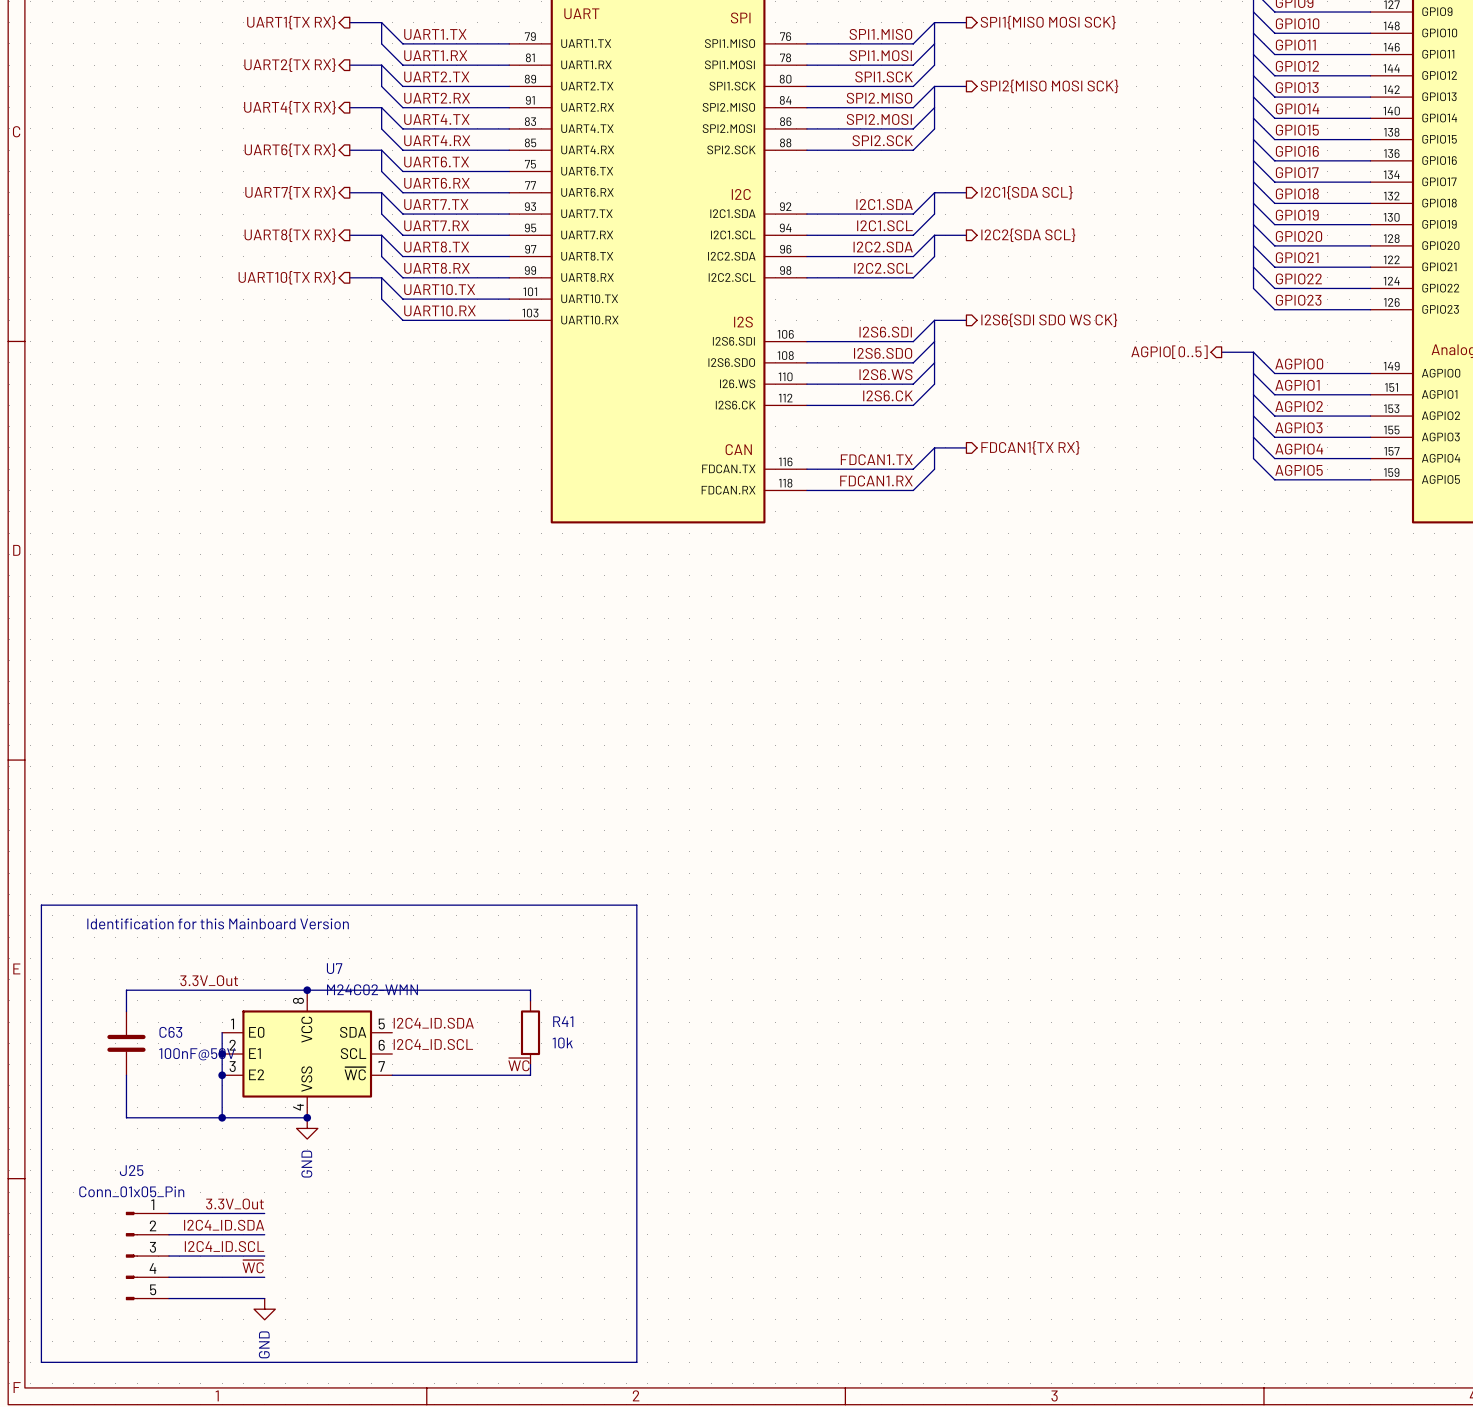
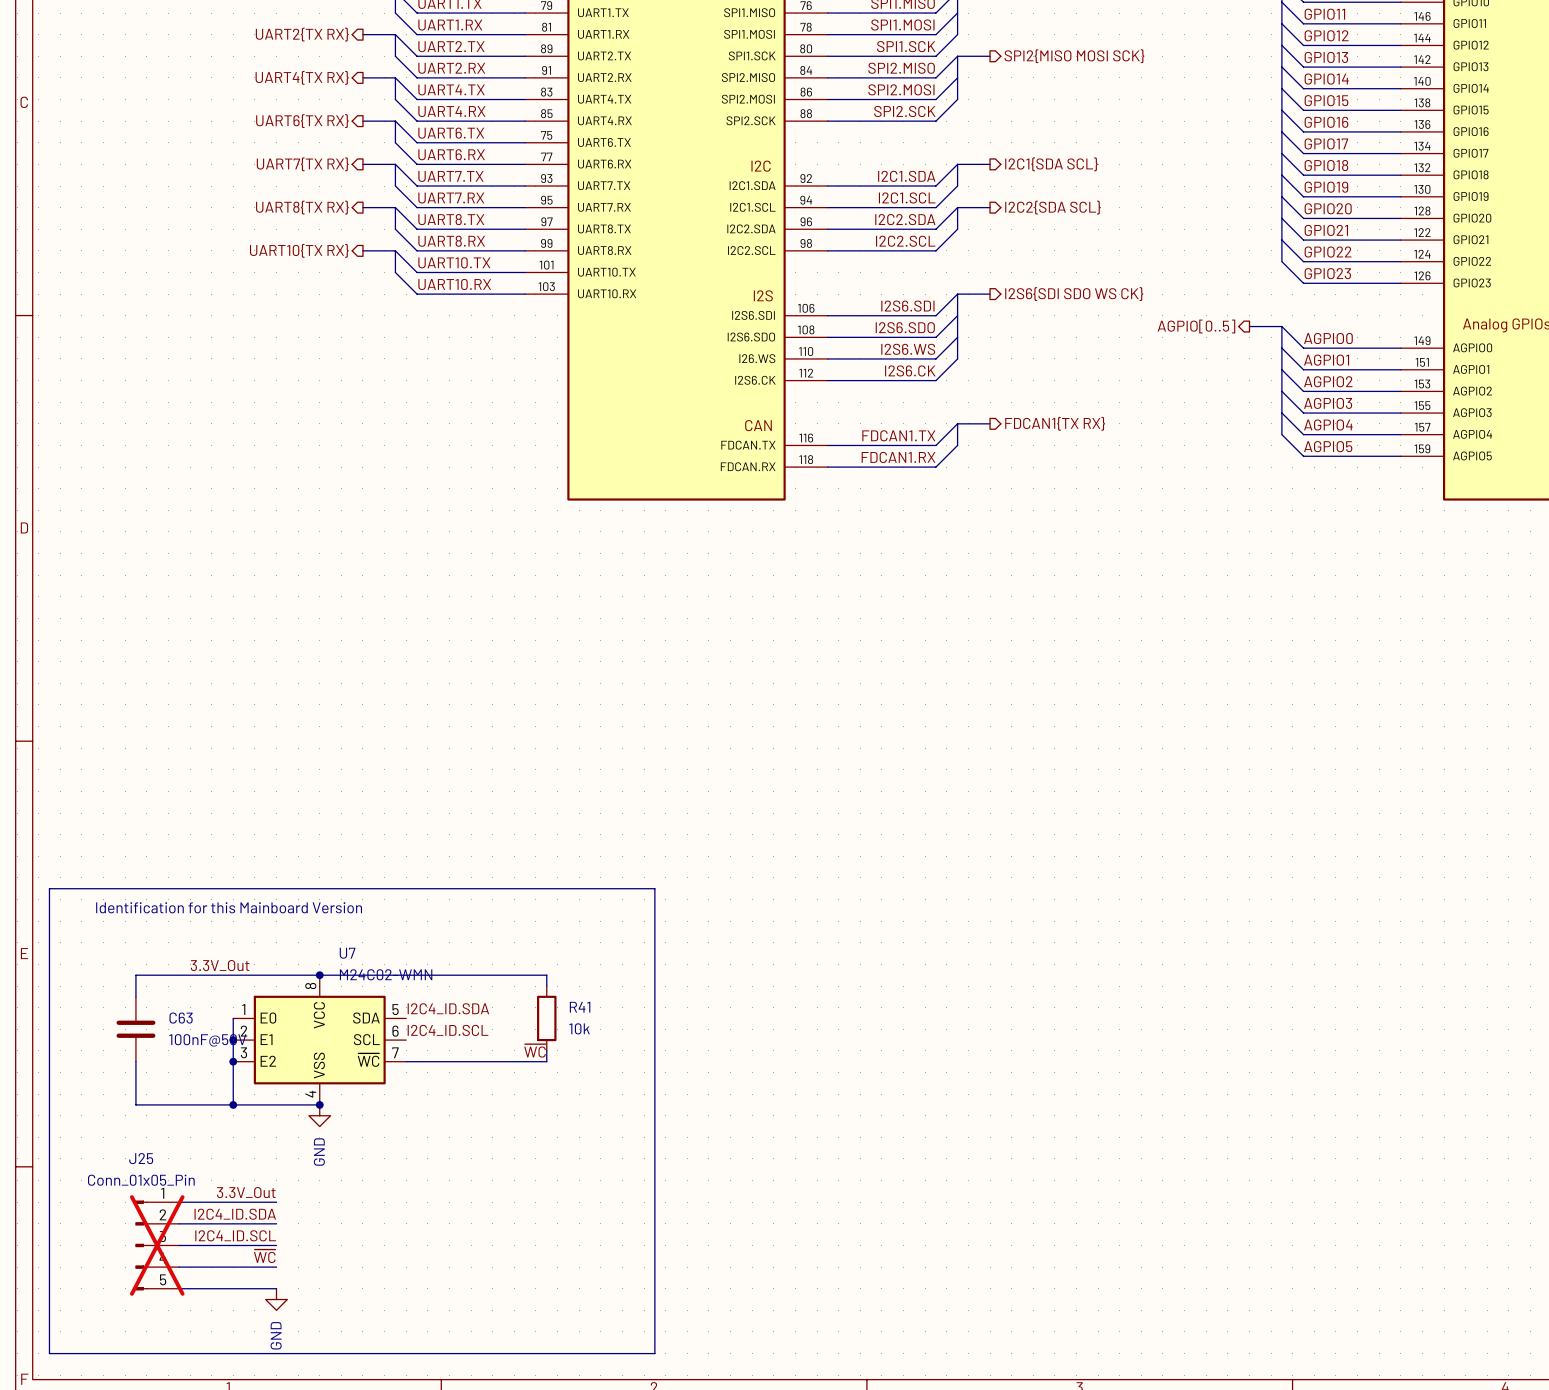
J25 do-not-place cross: none -> (157, 1245)

